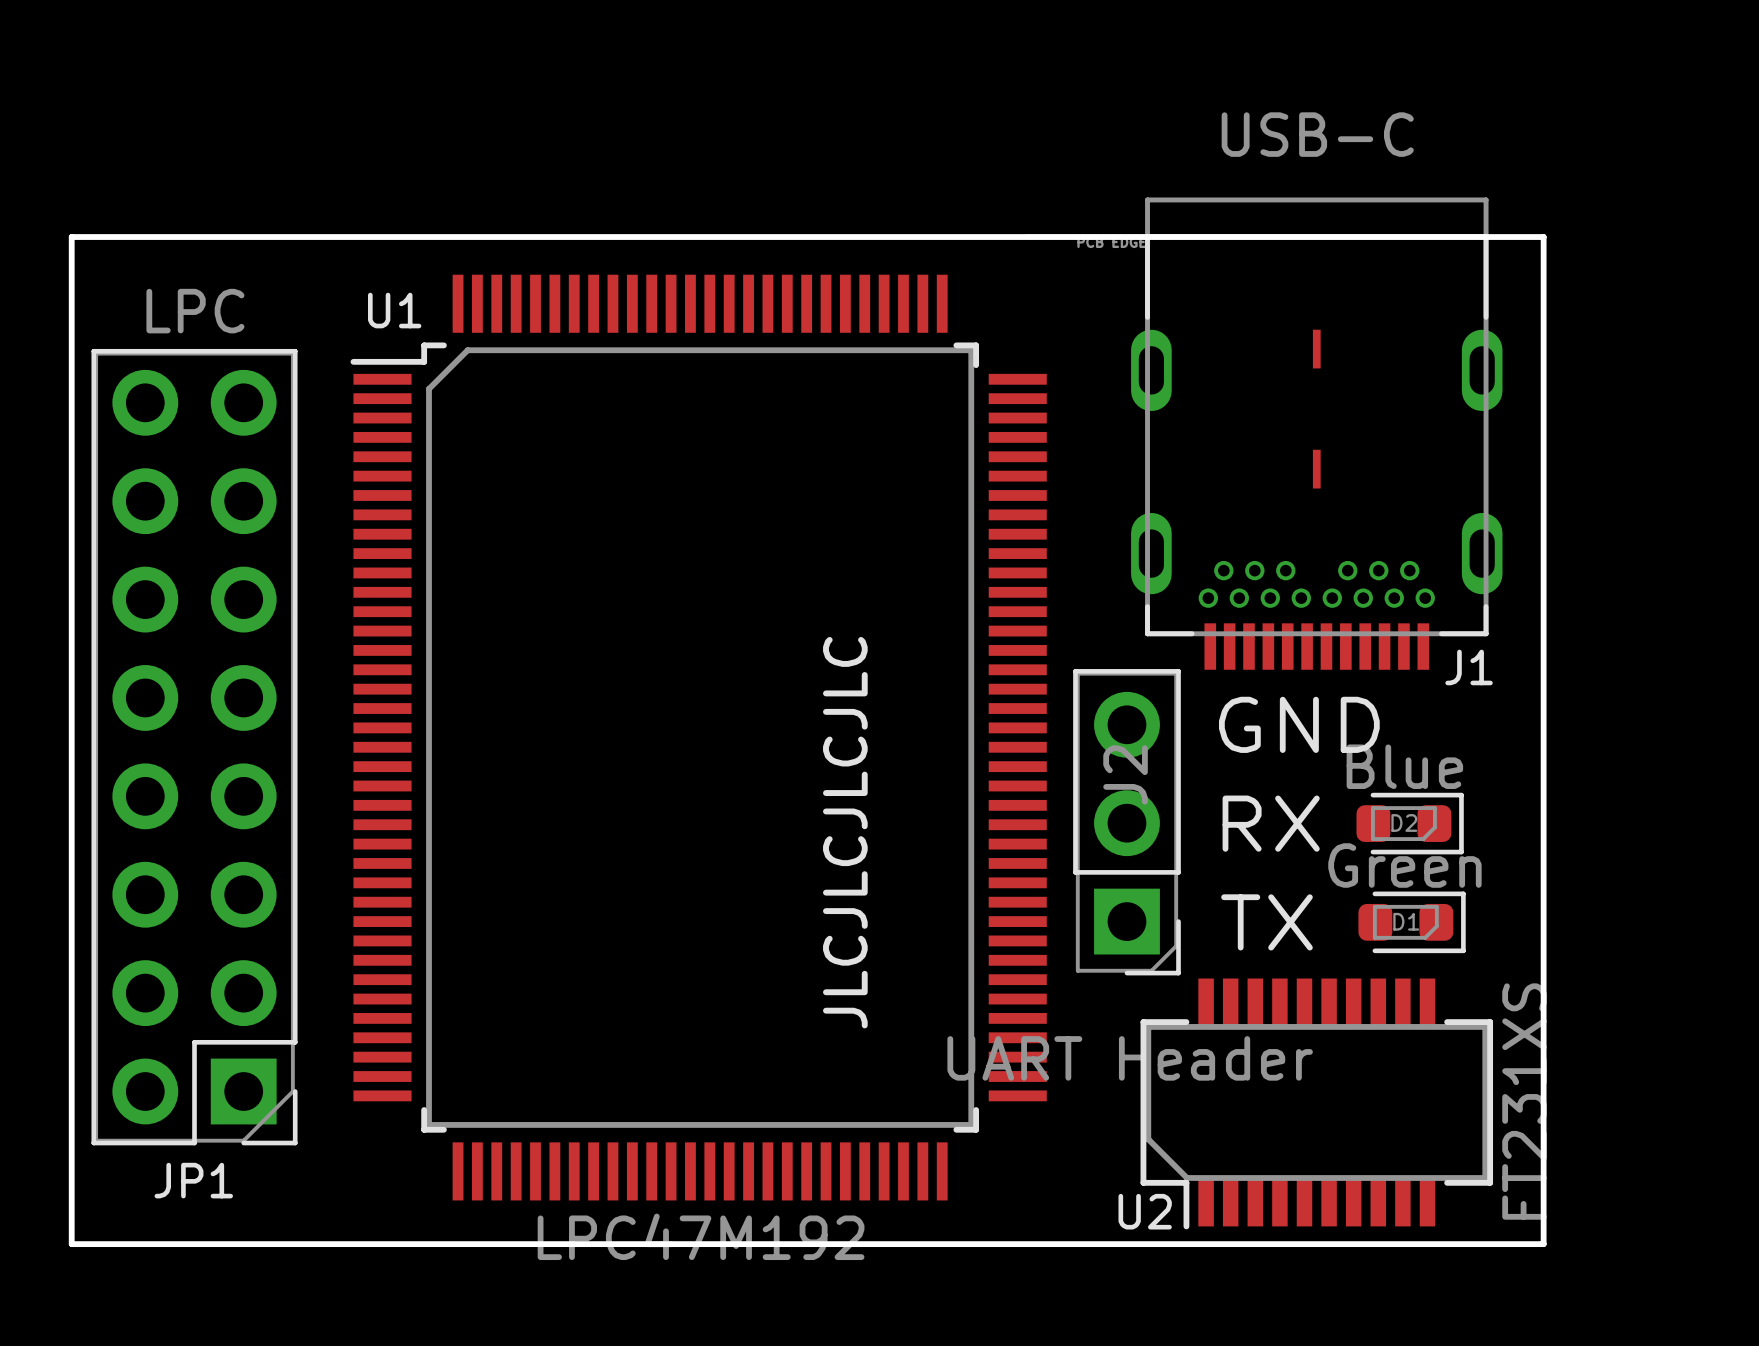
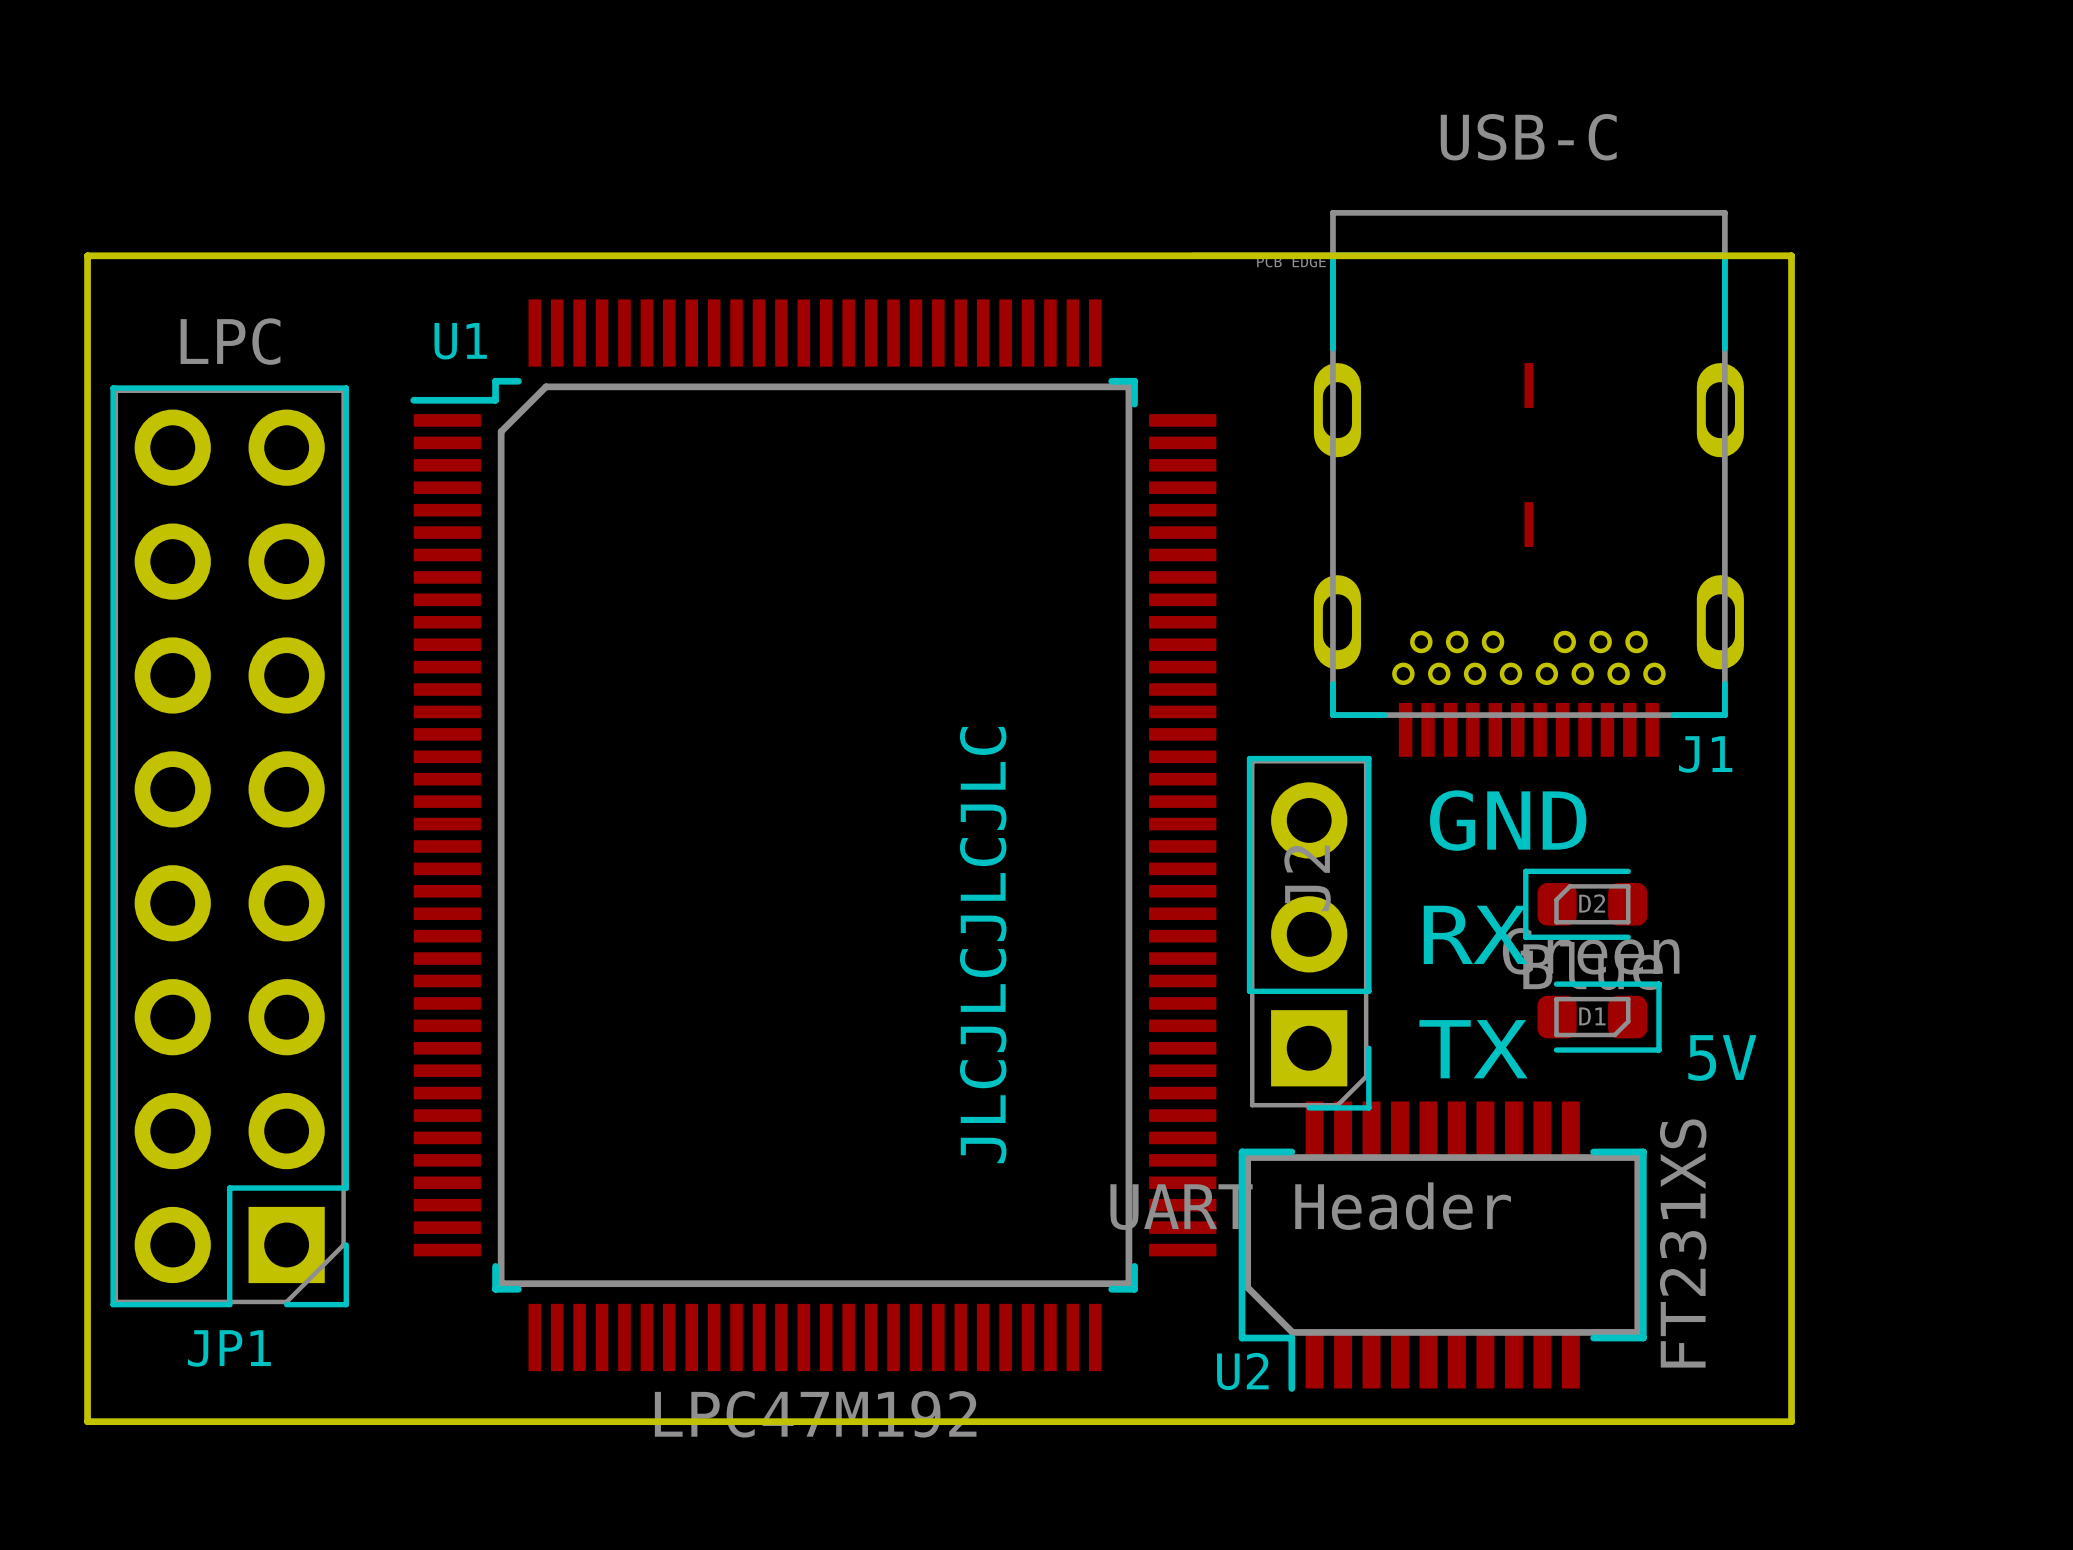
D2 rotation: 0° (1410, 823) -> 180° (1585, 904)
D1 position: (1412, 922) -> (1599, 1017)
text: none -> 5V (1722, 1057)
U2 position: (1316, 1103) -> (1442, 1246)

